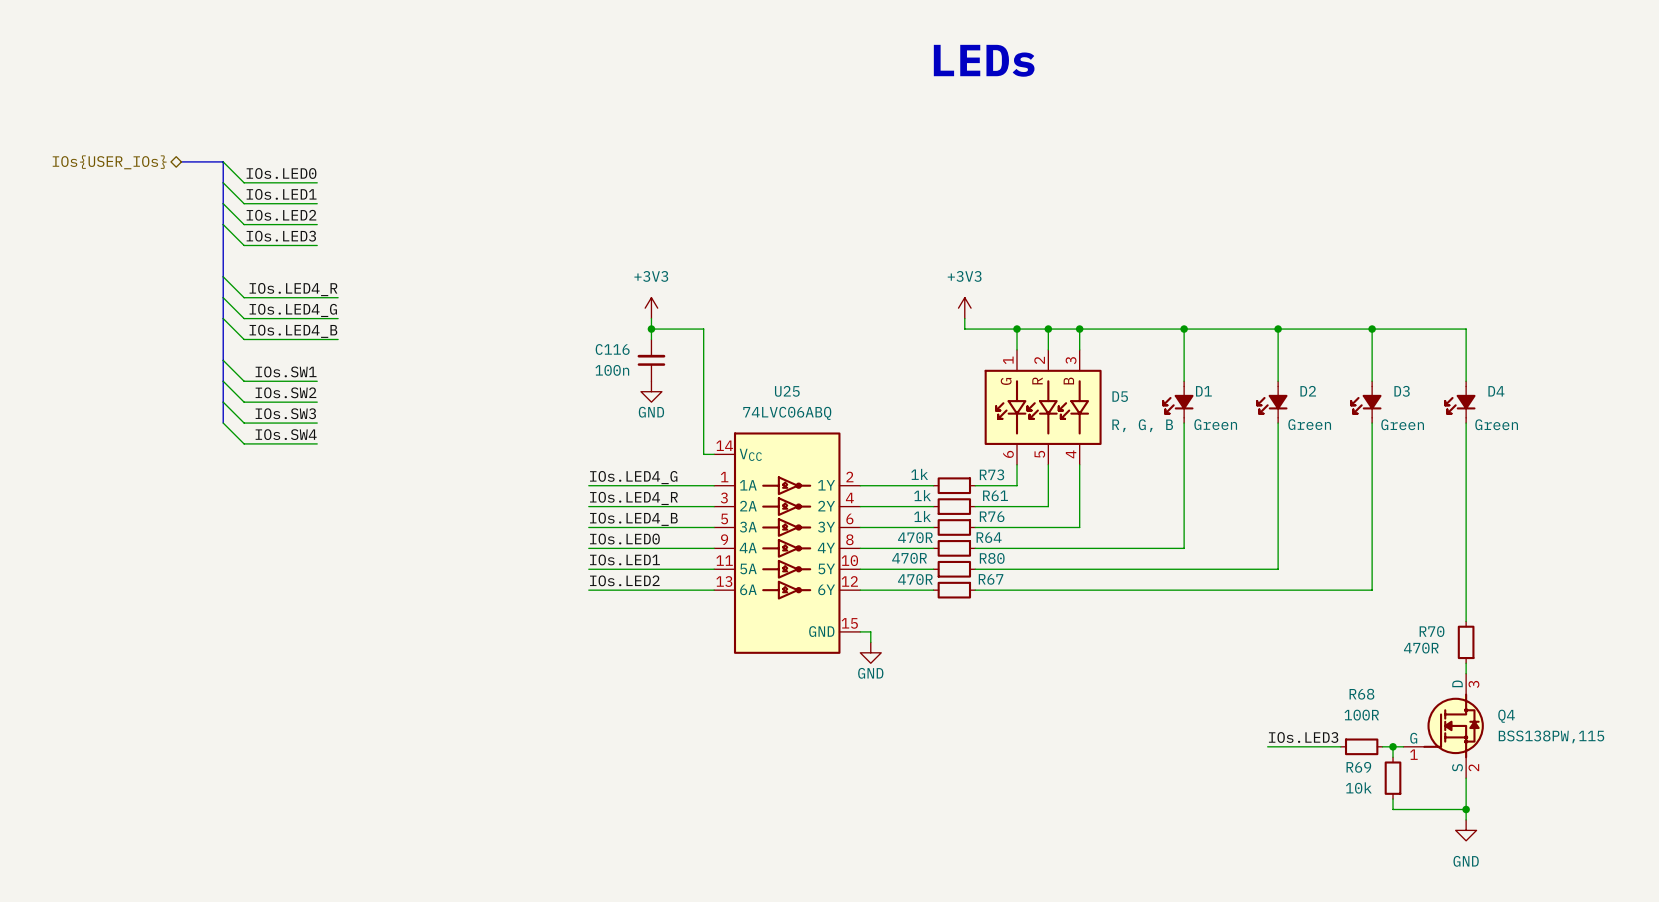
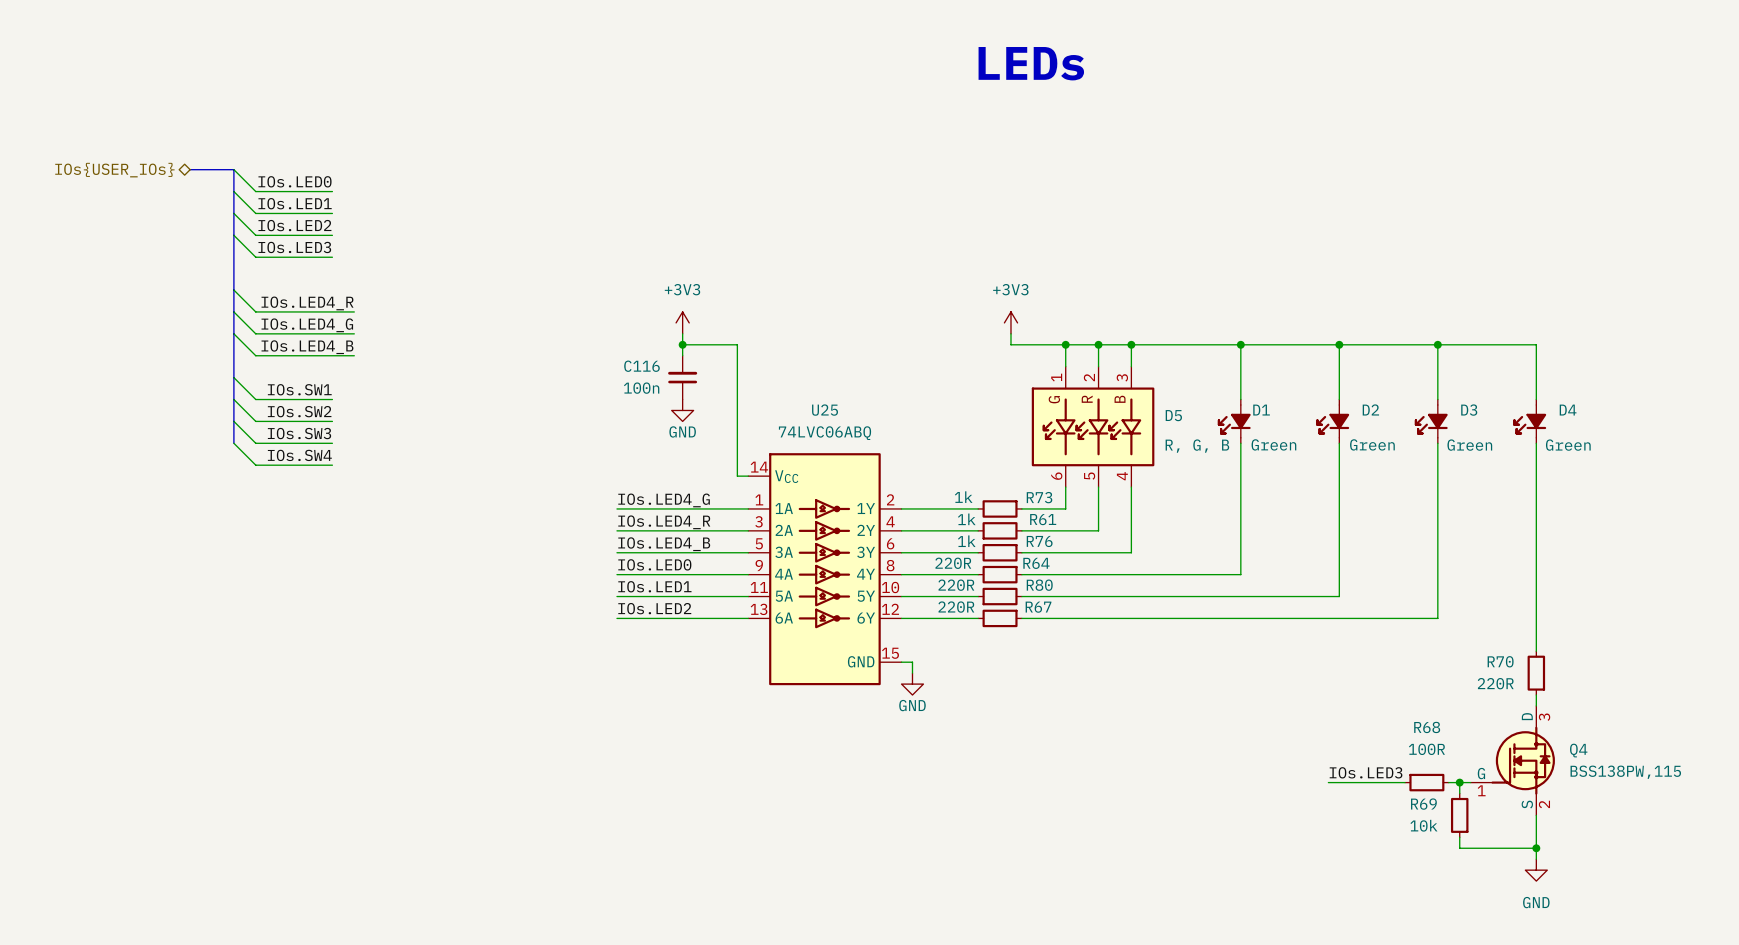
R64 text: 470R (915, 537) -> 220R (953, 563)
R80 text: 470R (909, 558) -> 220R (956, 585)
R67 text: 470R (915, 579) -> 220R (956, 607)
R70 text: 470R (1421, 648) -> 220R (1495, 683)

